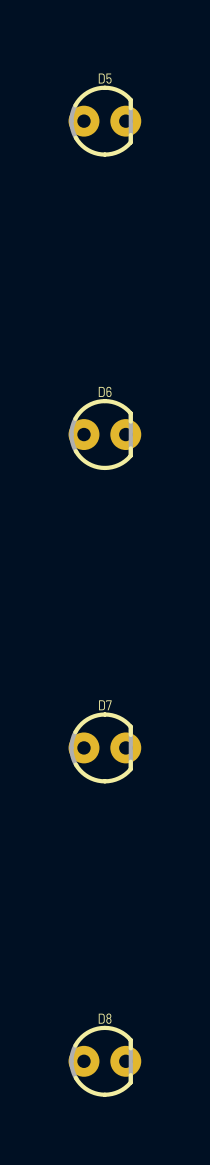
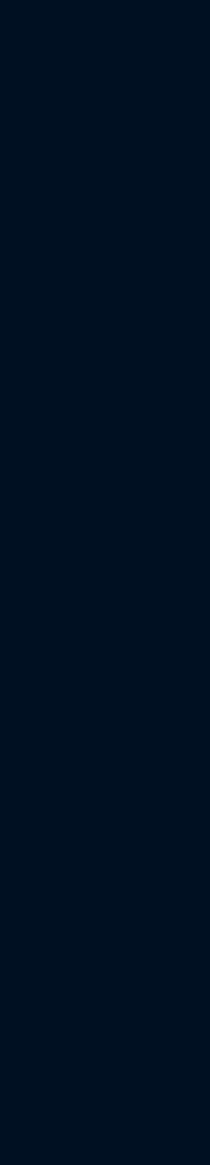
D5: (104, 121) -> none
D6: (104, 434) -> none
D7: (104, 747) -> none
D8: (104, 1061) -> none

